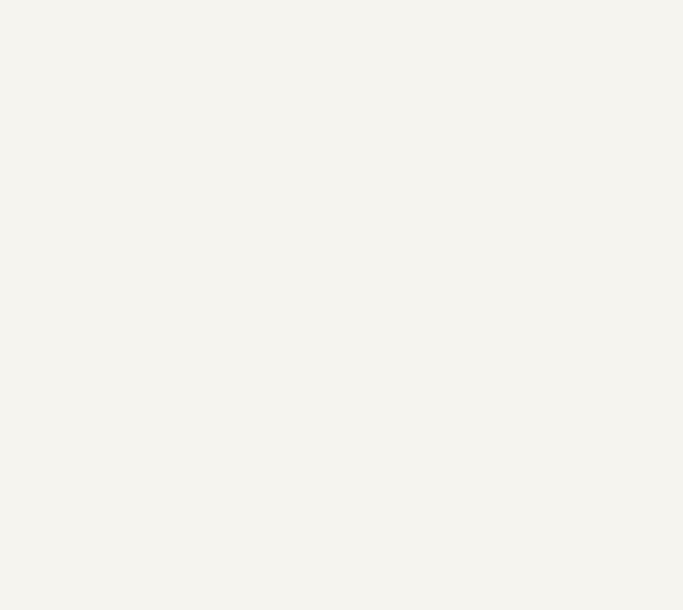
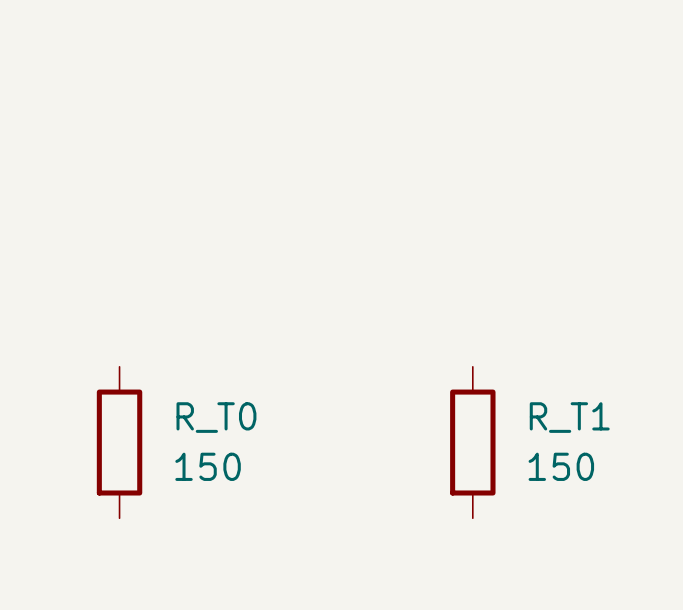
R_T0: none -> 150 (119, 442)
R_T1: none -> 150 (472, 442)

